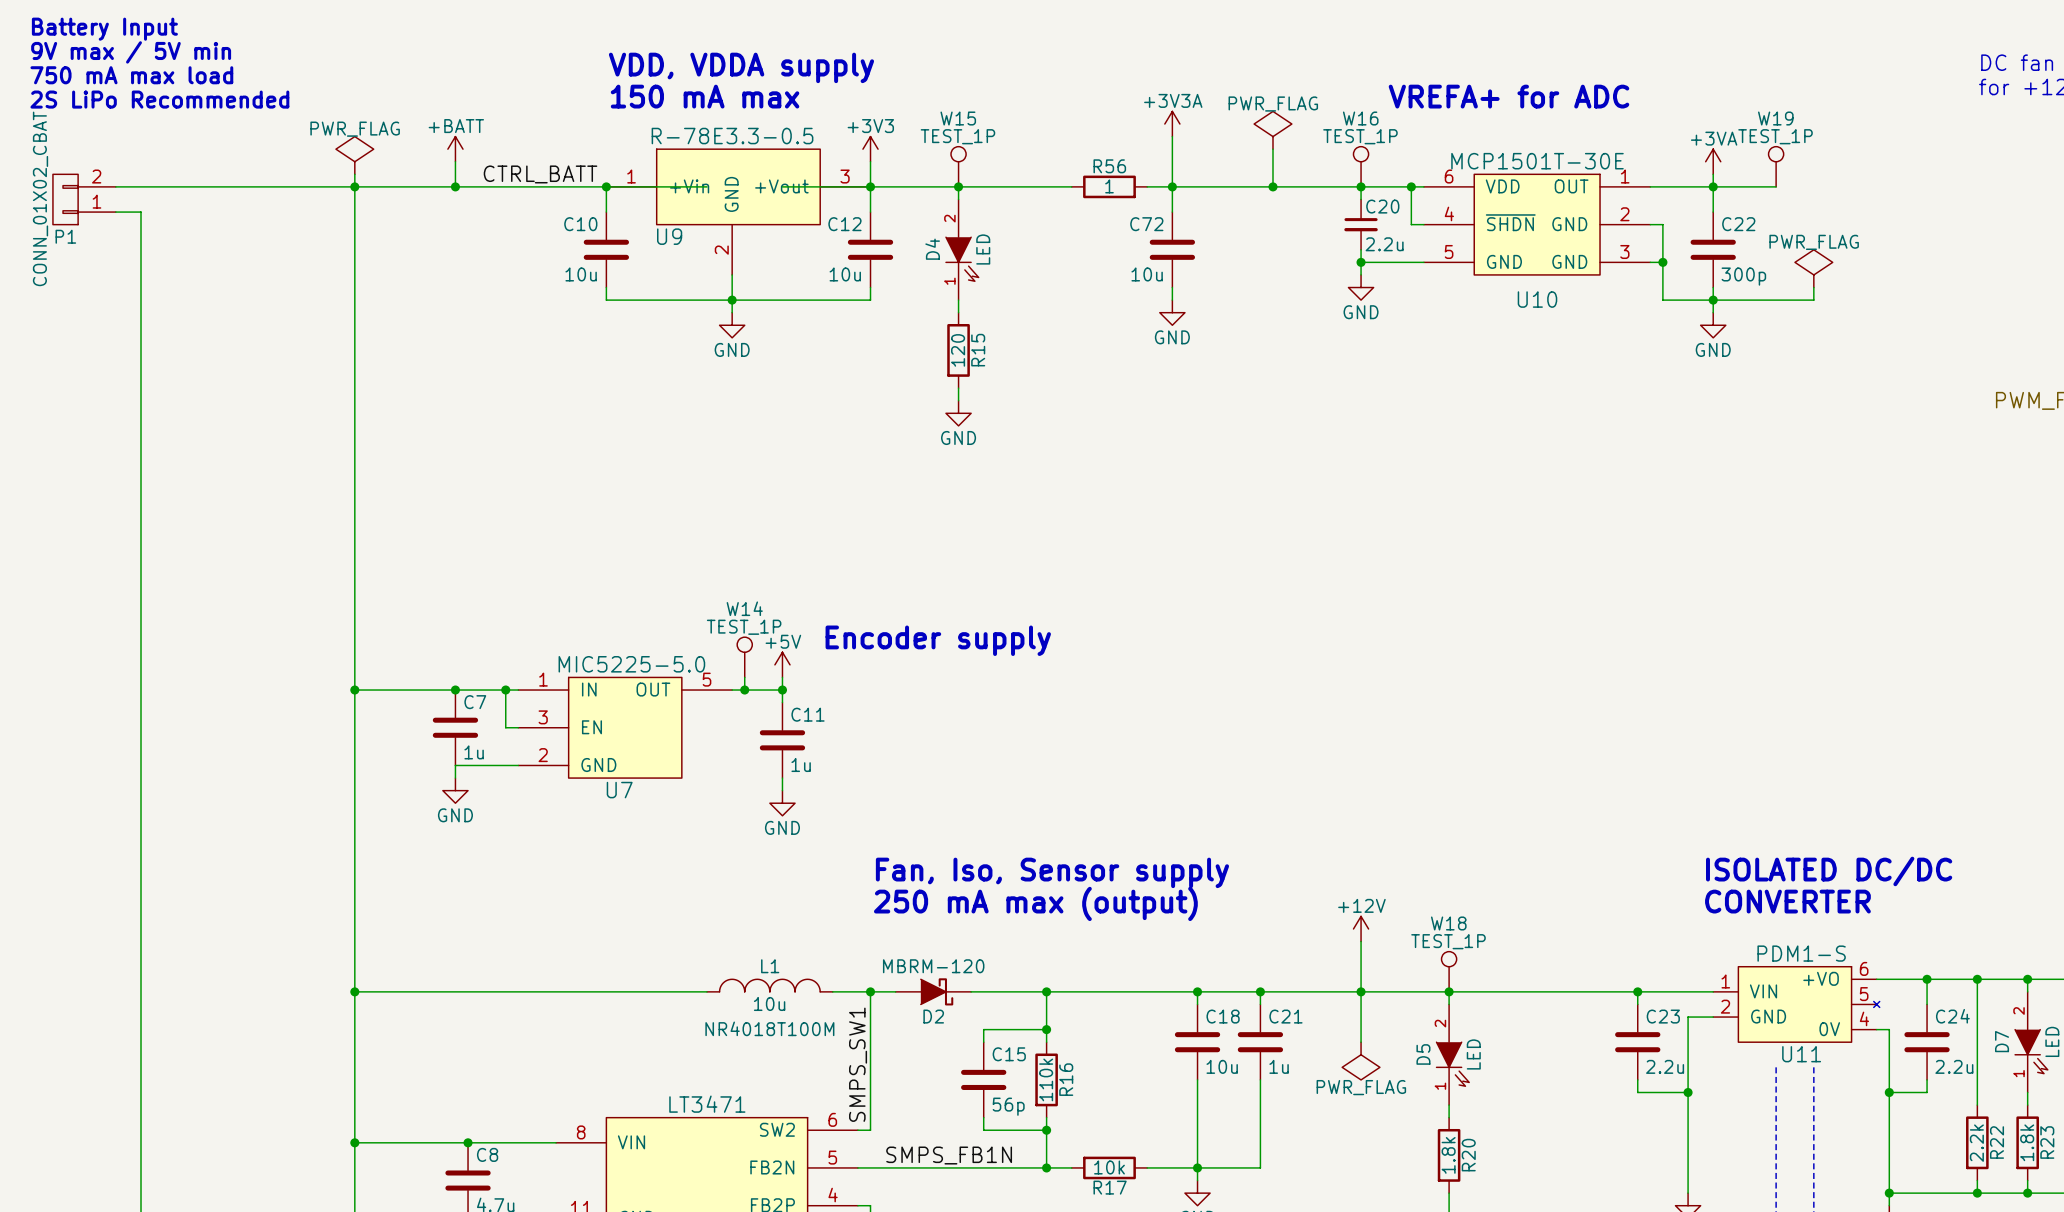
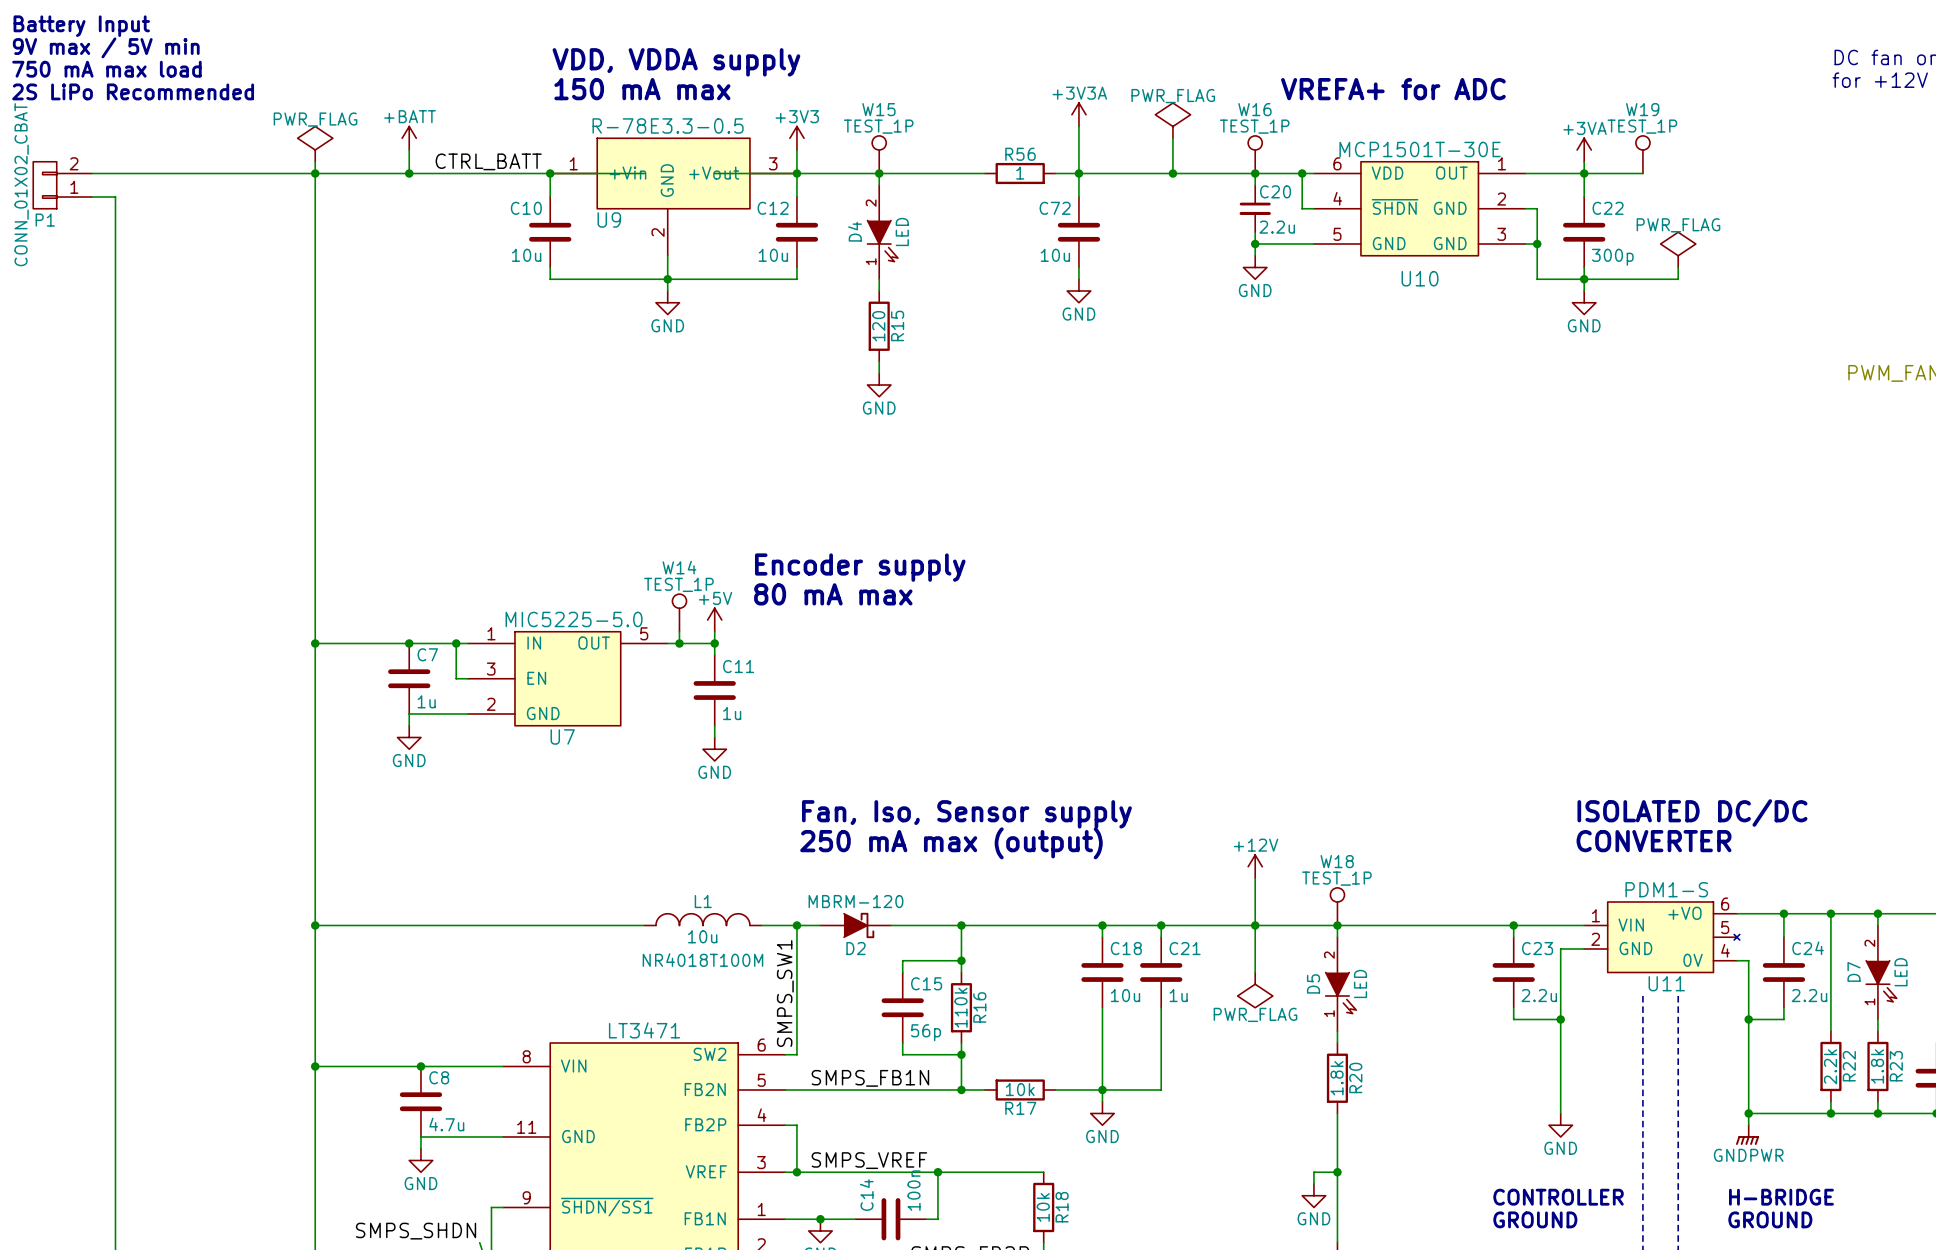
text: none -> Encoder supply (860, 567)
text: Encoder supply (938, 640) -> 80 mA max (833, 594)

